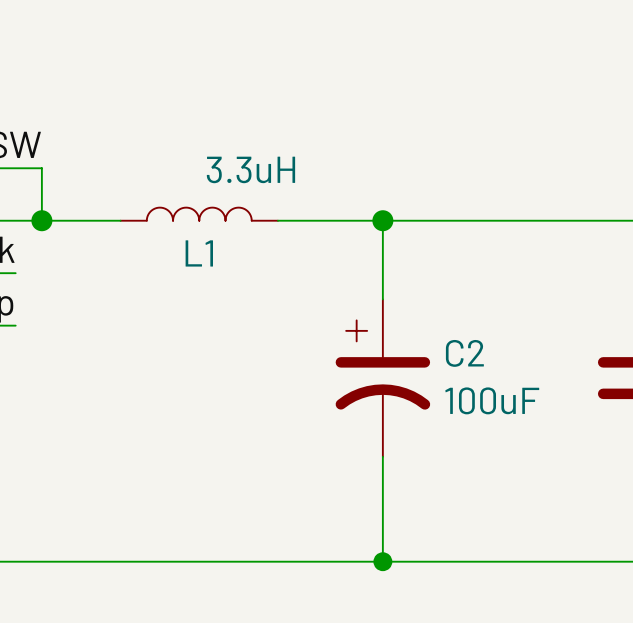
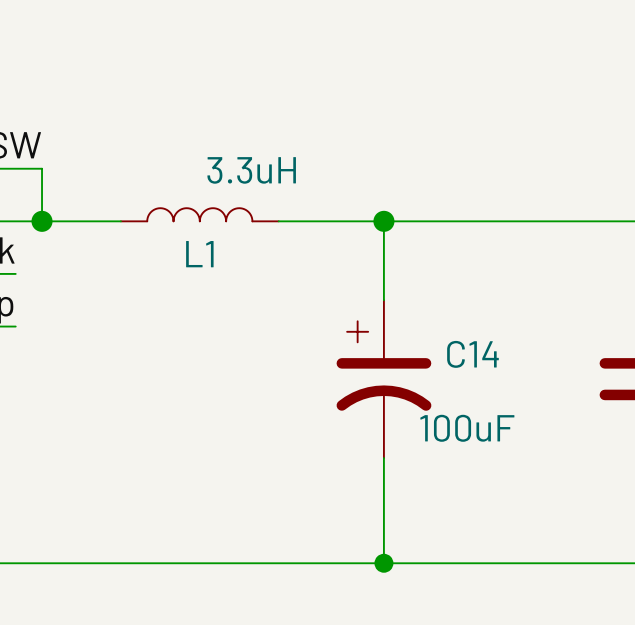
C2 name: C2 (464, 353) -> C14 (472, 354)
C2 value position: 100uF (492, 400) -> 100uF (467, 428)

